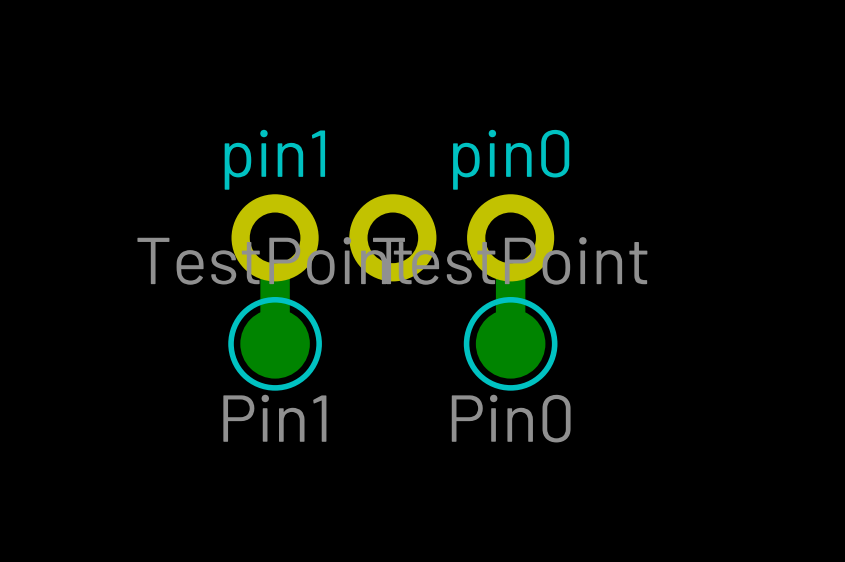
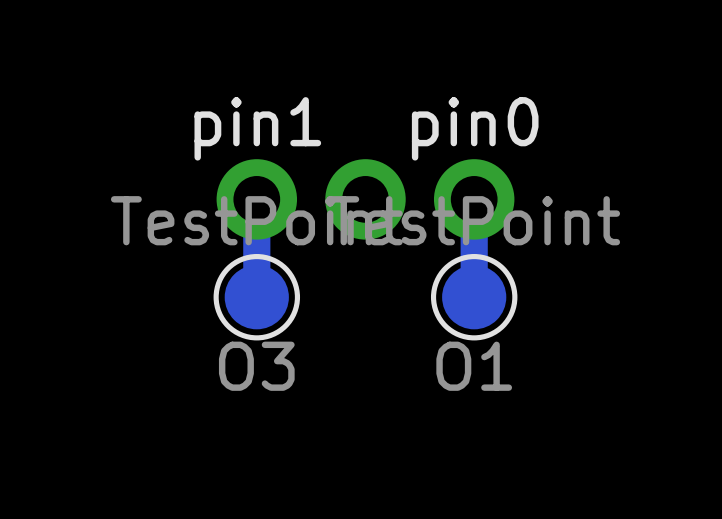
Pin1 name: Pin1 (274, 418) -> O3 (256, 366)
Pin0 name: Pin0 (511, 418) -> O1 (474, 366)

